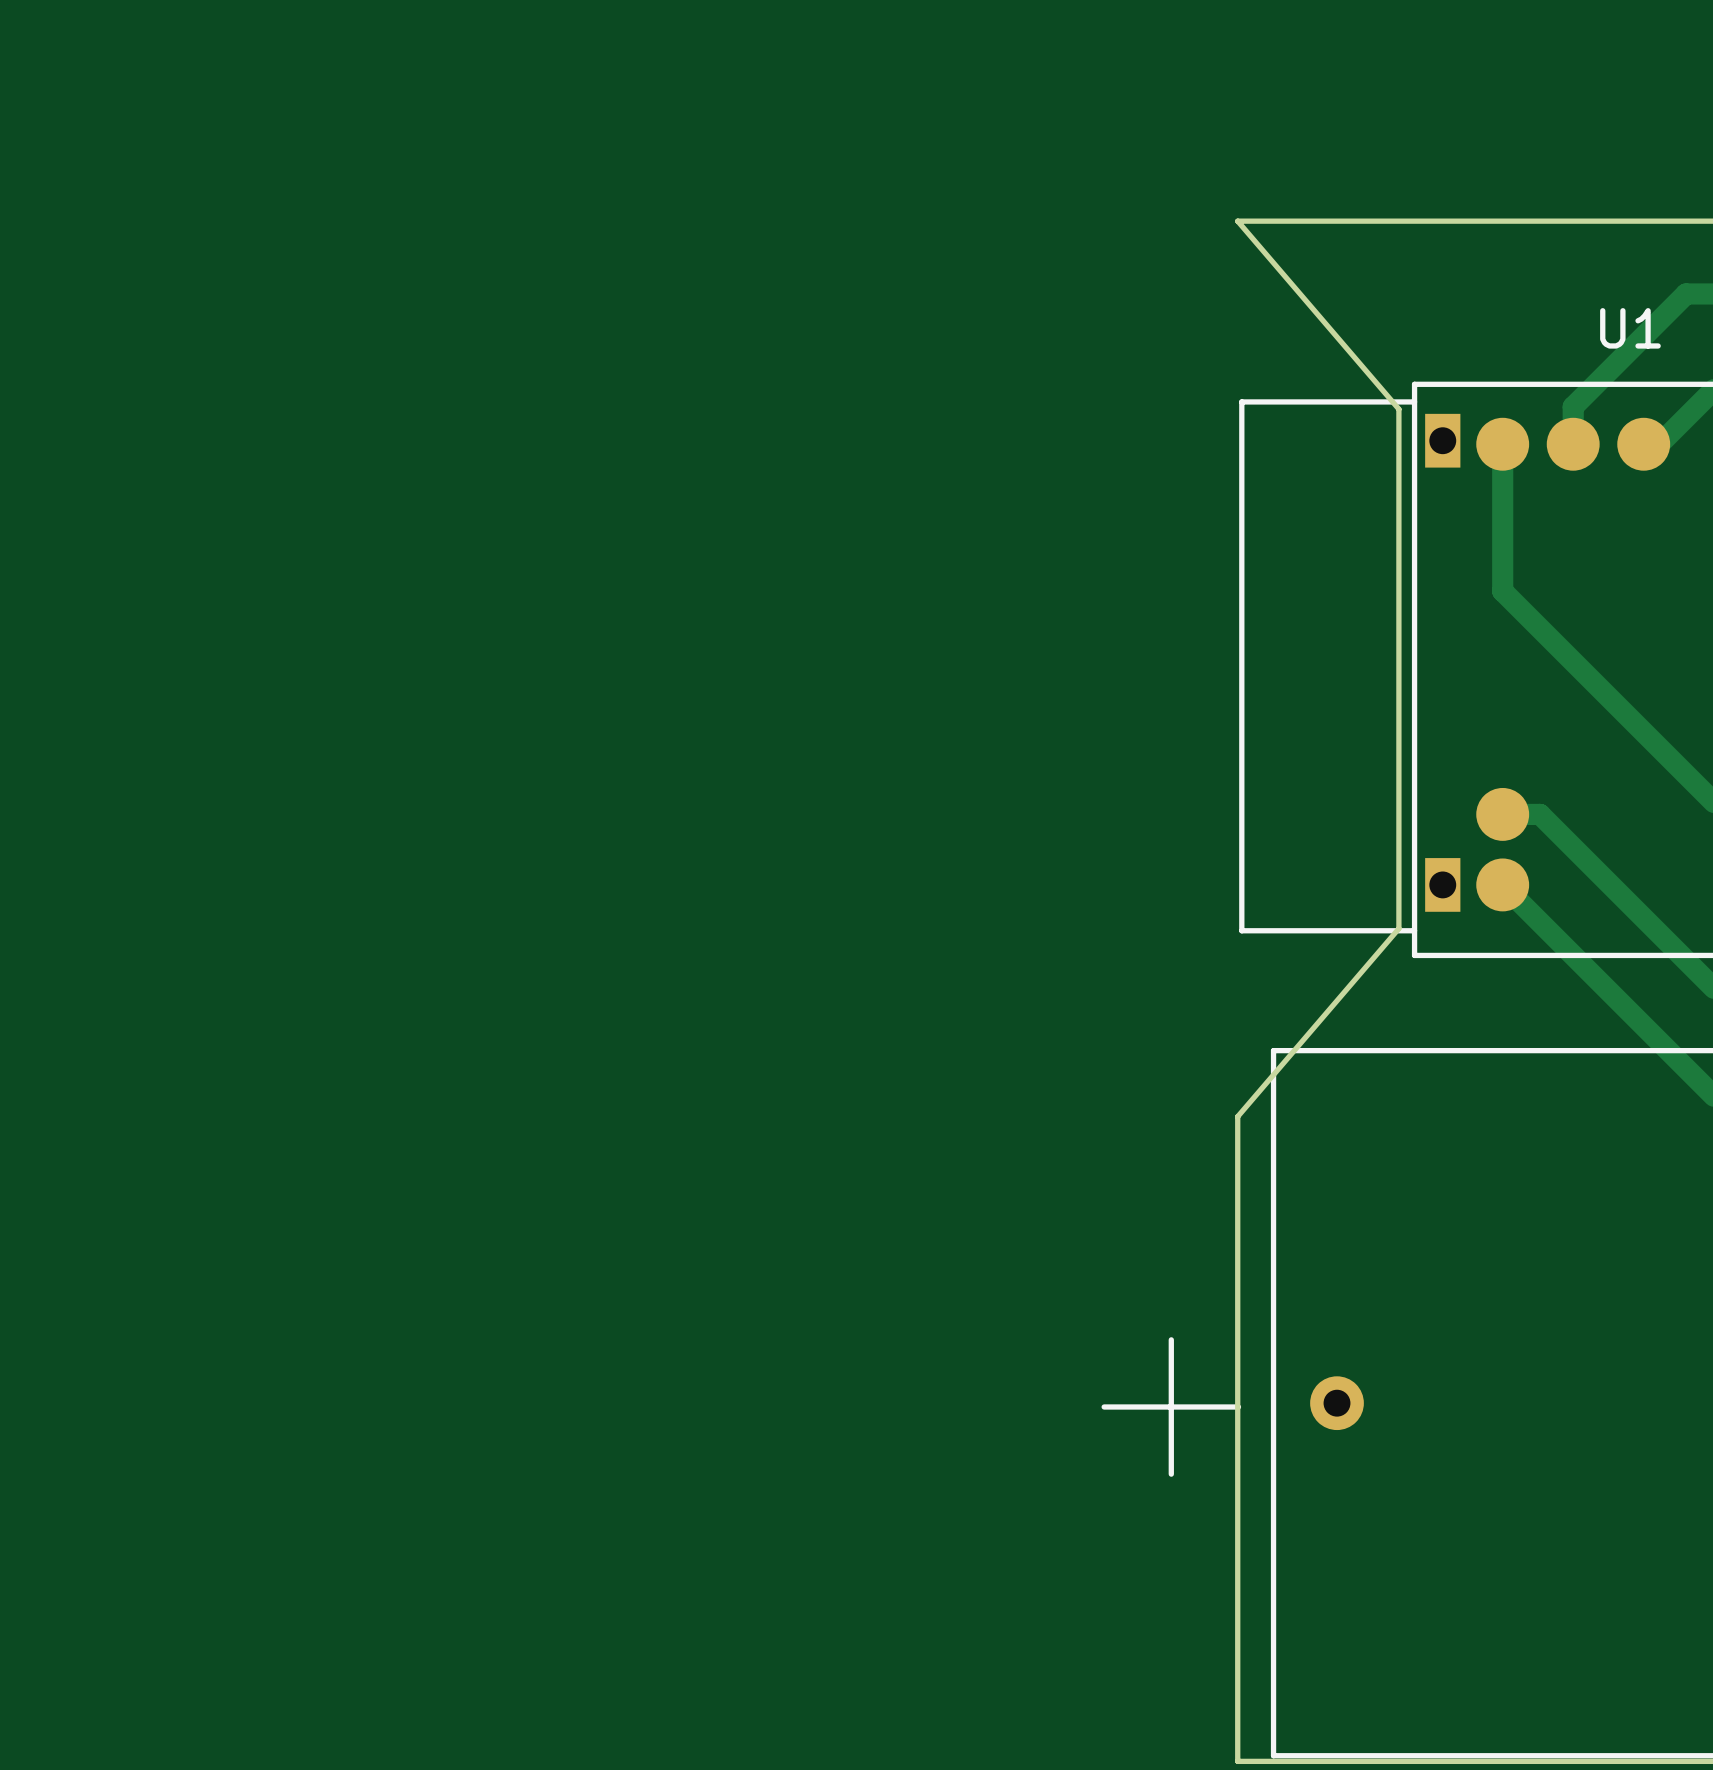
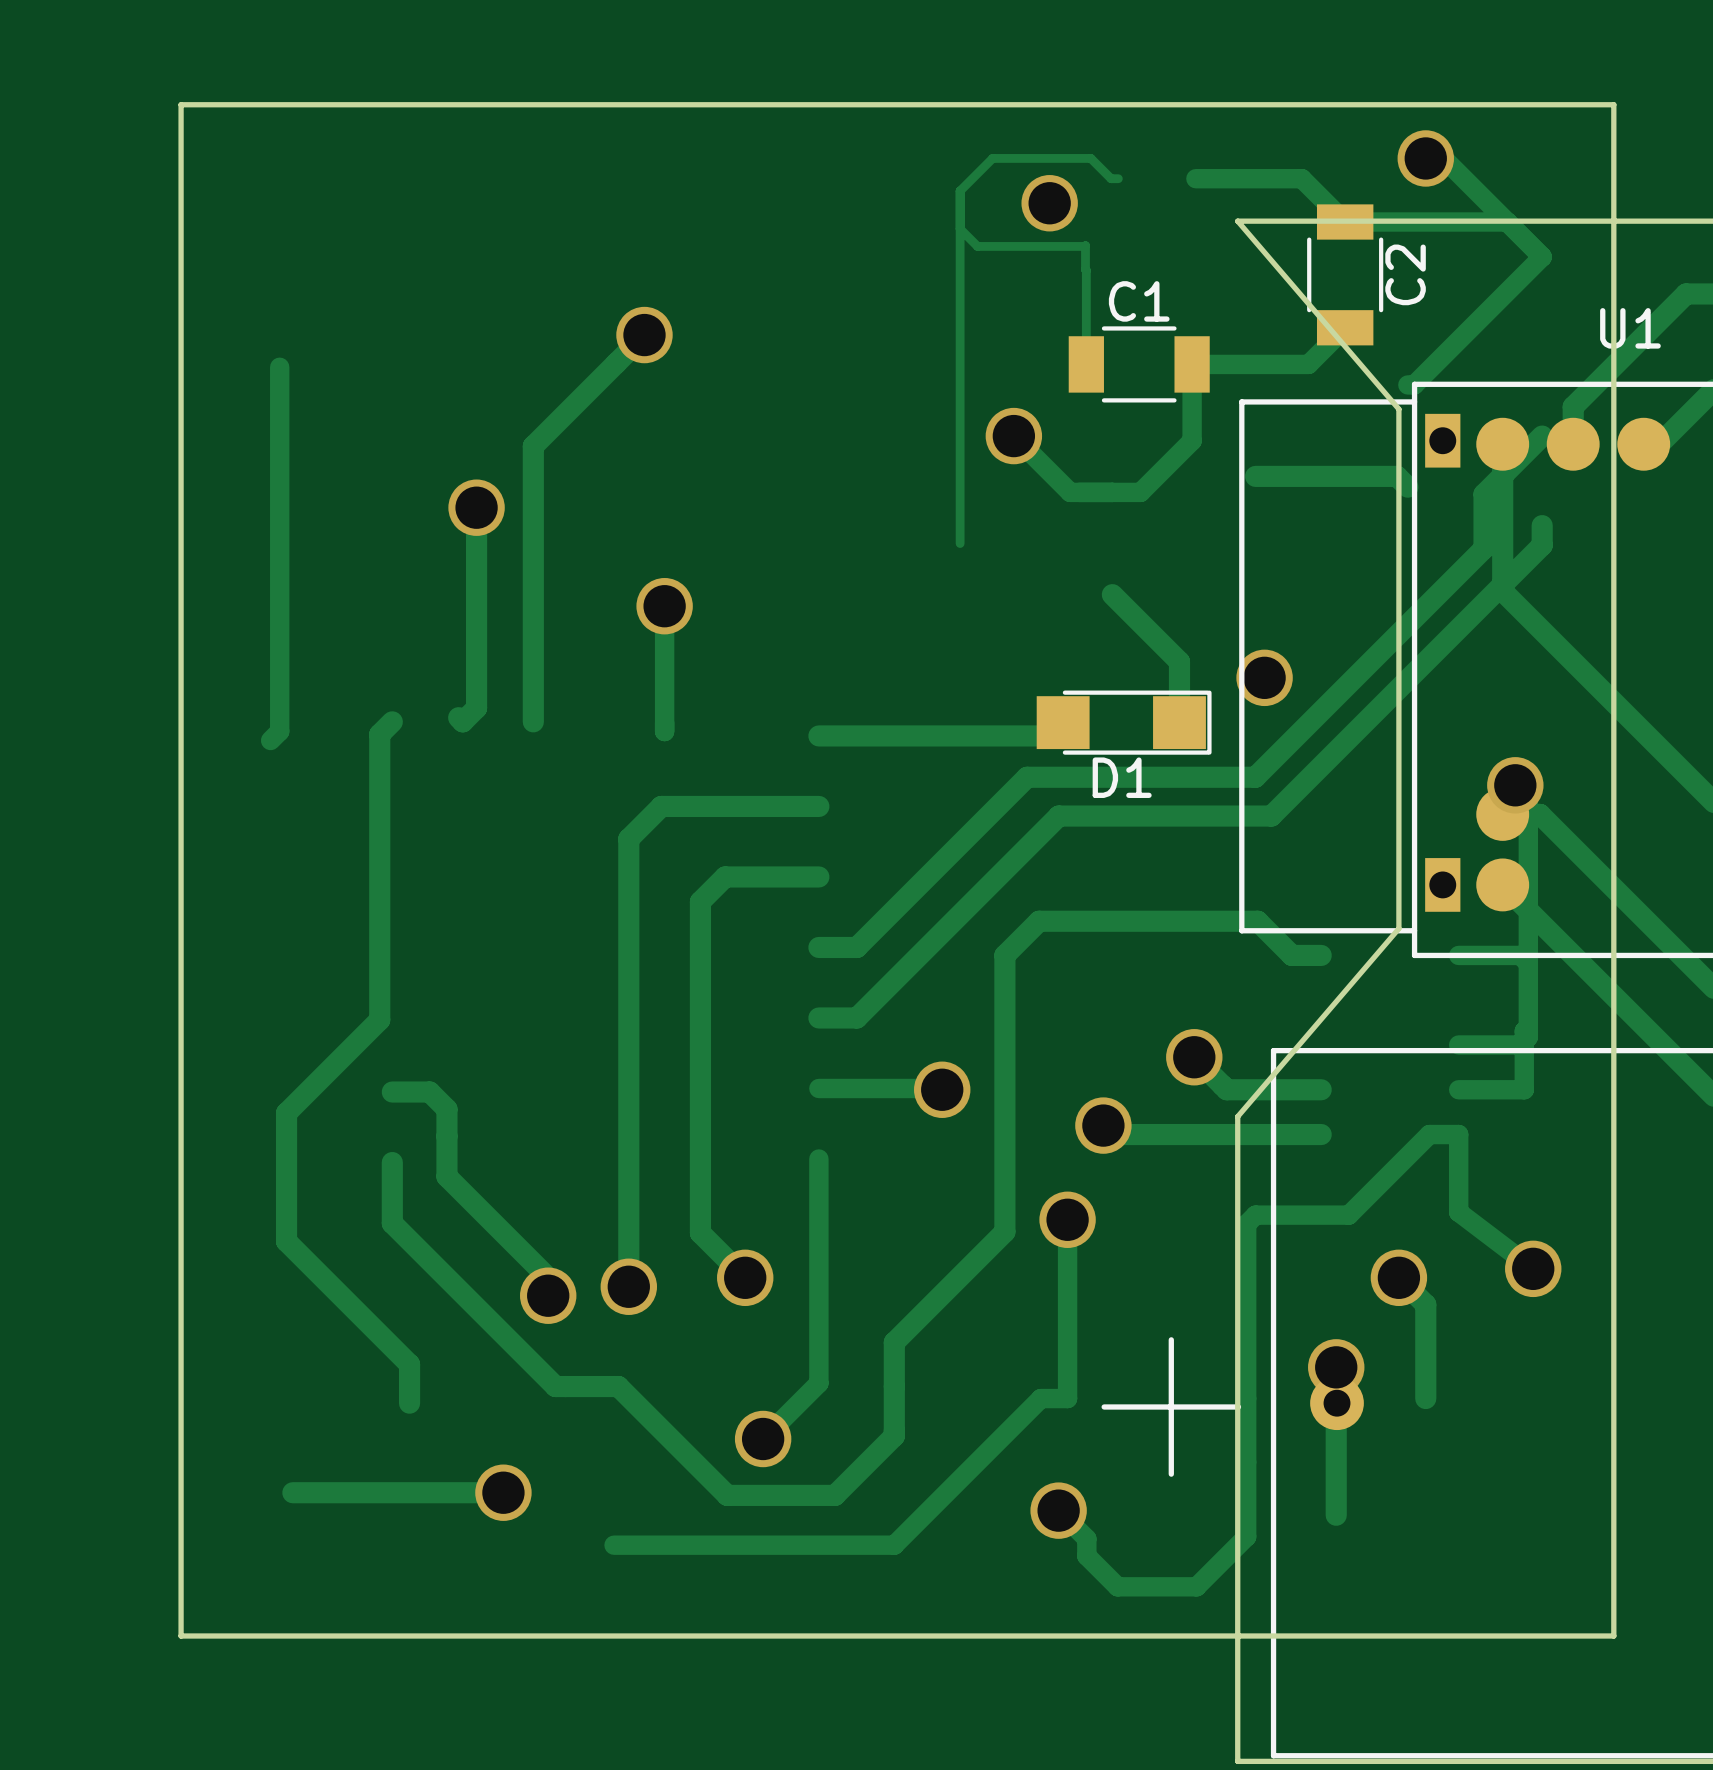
board edge: none -> (181, 104) (181, 1636) (1613, 1636) (1613, 104) (181, 104)
track: none -> (1425, 158) (1443, 158) (1542, 256) (1414, 384) (1407, 384)
via: none -> (1425, 158)
track: none -> (1118, 178) (1111, 178) (1090, 158) (992, 158) (960, 190) (960, 543)
track: none -> (1195, 178) (1301, 178) (1345, 222) (1507, 222)
via: none -> (1049, 203)
track: none -> (960, 228) (977, 246) (1085, 245) (1086, 364)
C2: none -> (1345, 274)
track: none -> (1345, 327) (1308, 364) (1192, 364) (1192, 440) (1140, 492) (1070, 492) (1013, 436)
track: none -> (644, 335) (533, 446) (533, 721)
via: none -> (644, 335)
C1: none -> (1139, 364)
track: none -> (279, 367) (279, 731) (270, 740)
via: none -> (1013, 436)
track: none -> (1542, 436) (1484, 494) (1484, 548) (1255, 777) (1027, 777) (856, 947) (818, 947)
track: none -> (1255, 476) (1397, 476) (1407, 487)
track: none -> (476, 507) (476, 708) (462, 721) (458, 717)
via: none -> (476, 507)
track: none -> (1542, 525) (1542, 545) (1271, 816) (1058, 816) (856, 1017) (818, 1017)
track: none -> (1112, 594) (1179, 661) (1179, 722)
track: none -> (664, 606) (664, 731)
via: none -> (664, 606)
via: none -> (1264, 677)
track: none -> (392, 721) (379, 734) (379, 1019) (286, 1113) (286, 1241) (409, 1364) (409, 1403)
track: none -> (1063, 722) (1049, 735) (818, 735)
D1: none -> (1124, 722)
track: none -> (1515, 785) (1528, 798) (1528, 1037) (1520, 1044) (1458, 1044)
via: none -> (1515, 785)
track: none -> (818, 806) (661, 806) (628, 839) (628, 1286)
track: none -> (818, 876) (725, 876) (700, 901) (700, 1233) (745, 1277)
track: none -> (1321, 955) (1291, 955) (1257, 921) (1039, 921) (1004, 955) (1004, 1231) (894, 1342) (894, 1436) (834, 1495) (727, 1495) (618, 1386) (555, 1386) (392, 1223) (392, 1162)
track: none -> (1458, 955) (1520, 955) (1528, 963)
track: none -> (1528, 1027) (1524, 1031) (1524, 1089) (1458, 1089)
track: none -> (1194, 1057) (1226, 1089) (1321, 1089)
via: none -> (1194, 1057)
track: none -> (818, 1088) (942, 1089)
via: none -> (942, 1089)
track: none -> (392, 1092) (429, 1092) (446, 1109) (446, 1176) (548, 1277) (548, 1295)
track: none -> (1103, 1125) (1112, 1134) (1321, 1134)
via: none -> (1103, 1125)
track: none -> (818, 1159) (818, 1383) (763, 1438)
track: none -> (1067, 1219) (1067, 1398) (1040, 1398) (894, 1545) (614, 1545)
via: none -> (1067, 1219)
track: none -> (1533, 1268) (1458, 1212) (1458, 1134) (1429, 1134) (1348, 1215) (1255, 1215) (1246, 1224) (1246, 1536) (1196, 1586) (1117, 1586) (1086, 1556) (1086, 1538) (1058, 1510)
via: none -> (1533, 1268)
via: none -> (745, 1277)
track: none -> (1398, 1277) (1425, 1304) (1425, 1398)
via: none -> (1398, 1277)
via: none -> (628, 1286)
via: none -> (548, 1295)
track: none -> (1336, 1367) (1336, 1515)
via: none -> (1336, 1367)
via: none -> (763, 1438)
track: none -> (292, 1492) (503, 1492)
via: none -> (503, 1492)
via: none -> (1058, 1510)

